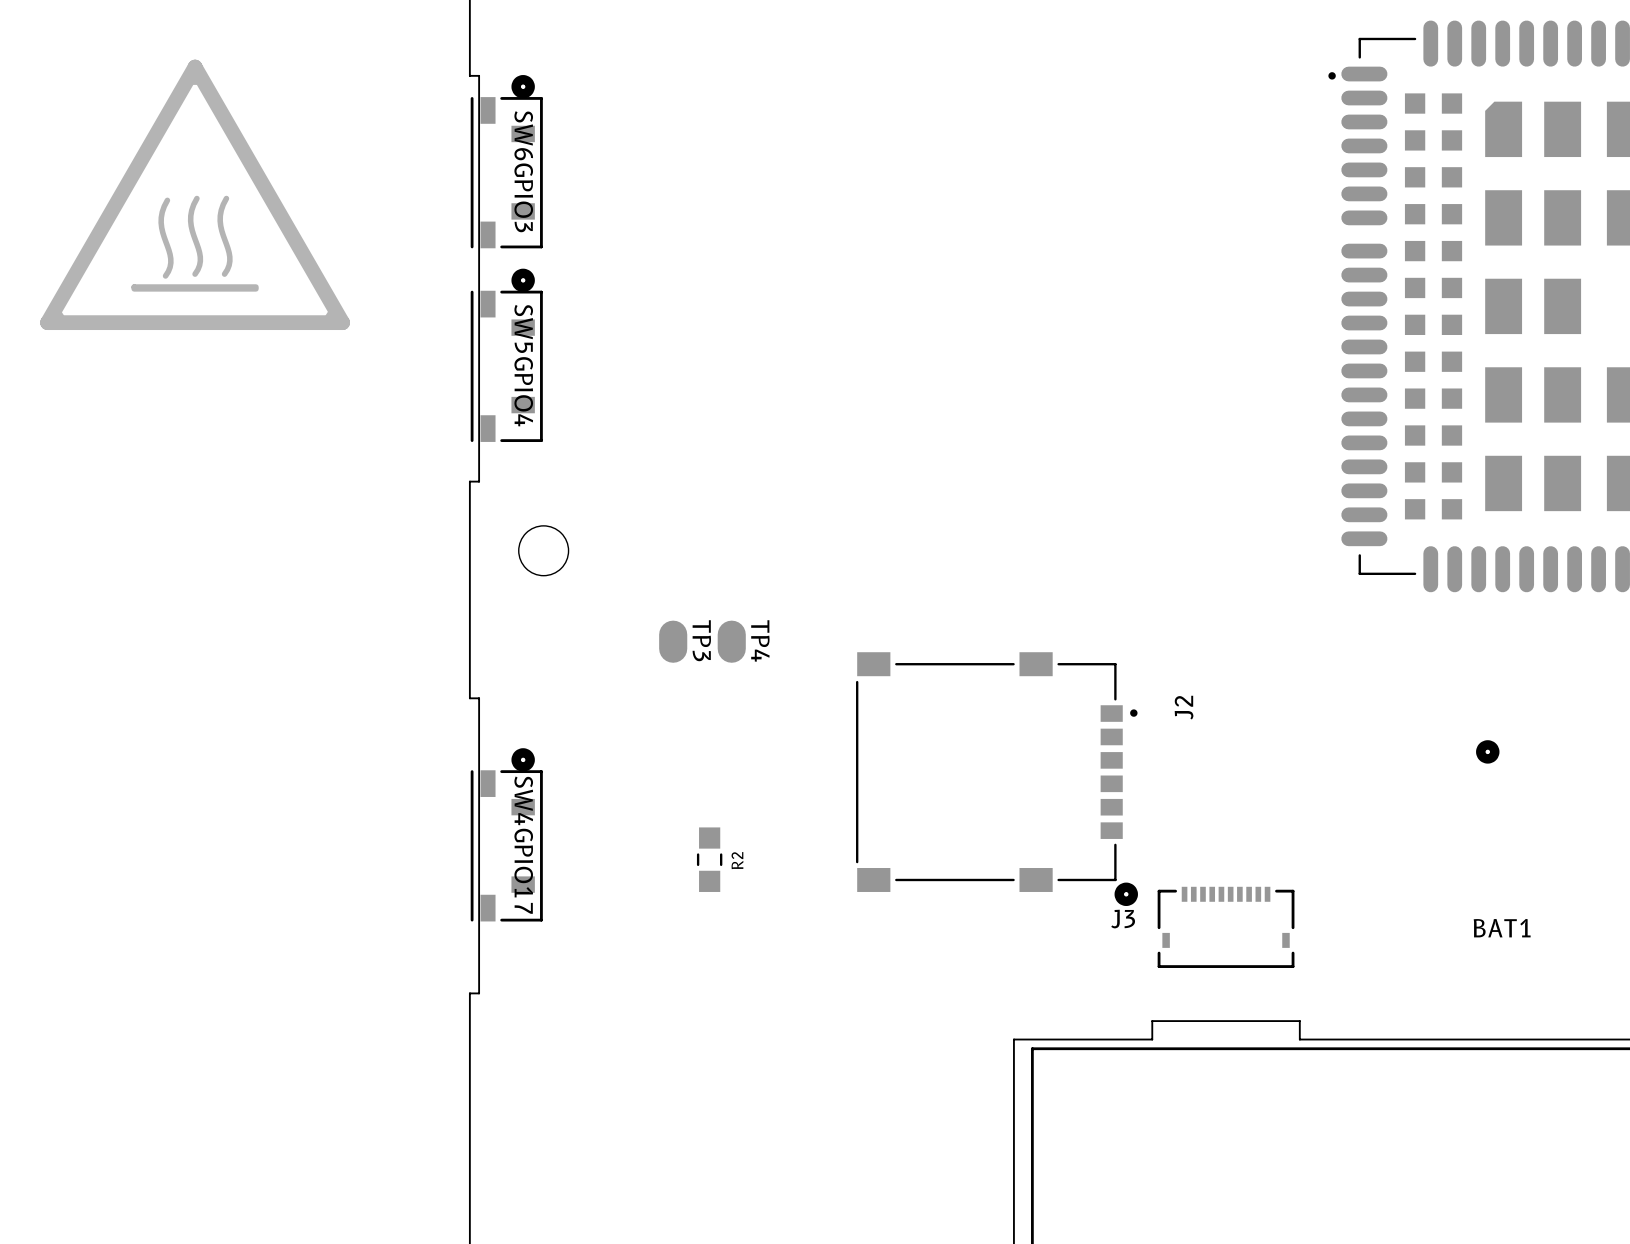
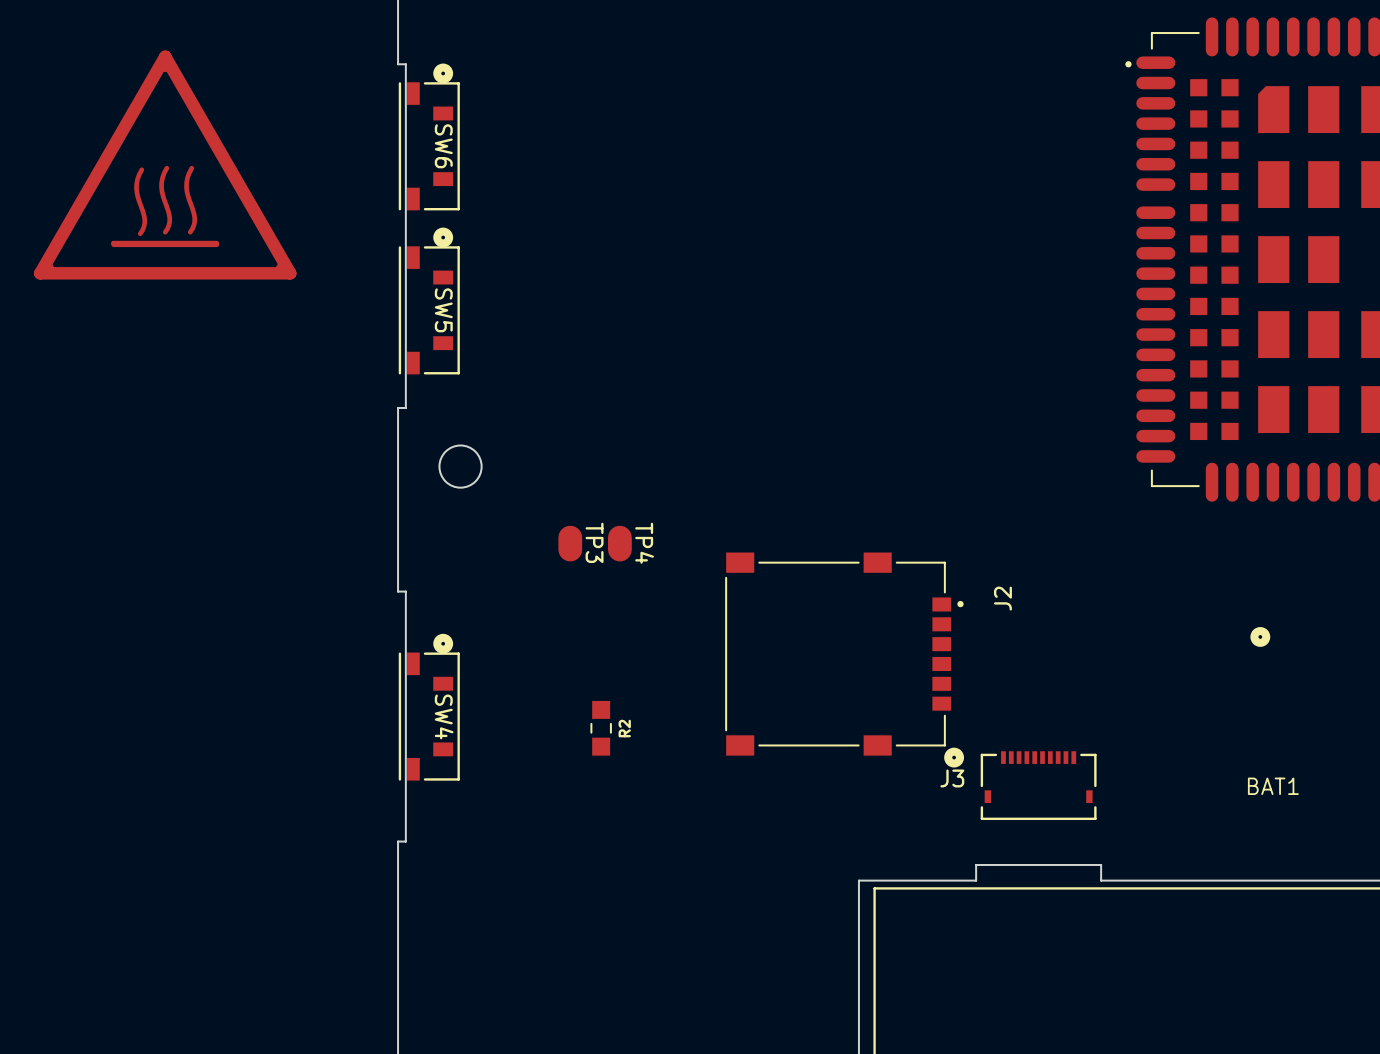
SW6GPIO3 name: SW6GPIO3 (523, 171) -> SW6 (443, 146)
SW5GPIO4 name: SW5GPIO4 (523, 365) -> SW5 (443, 310)
SW4GPIO17 name: SW4GPIO17 (523, 845) -> SW4 (444, 716)

